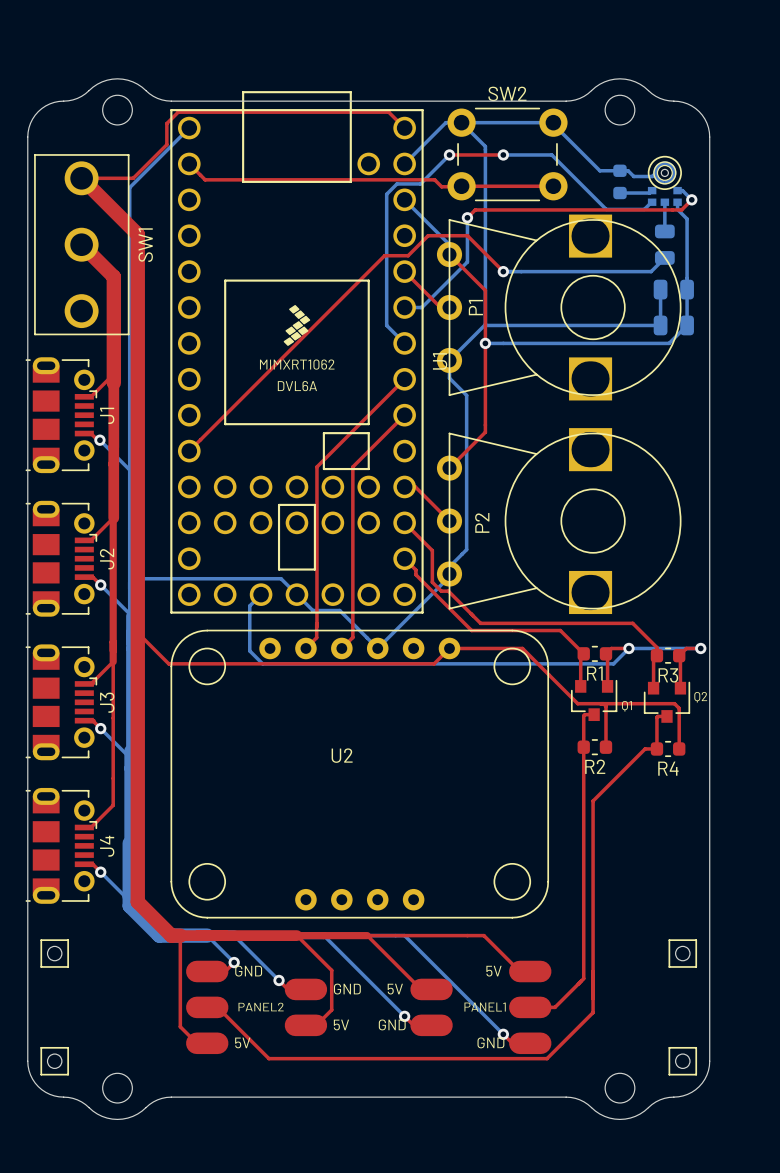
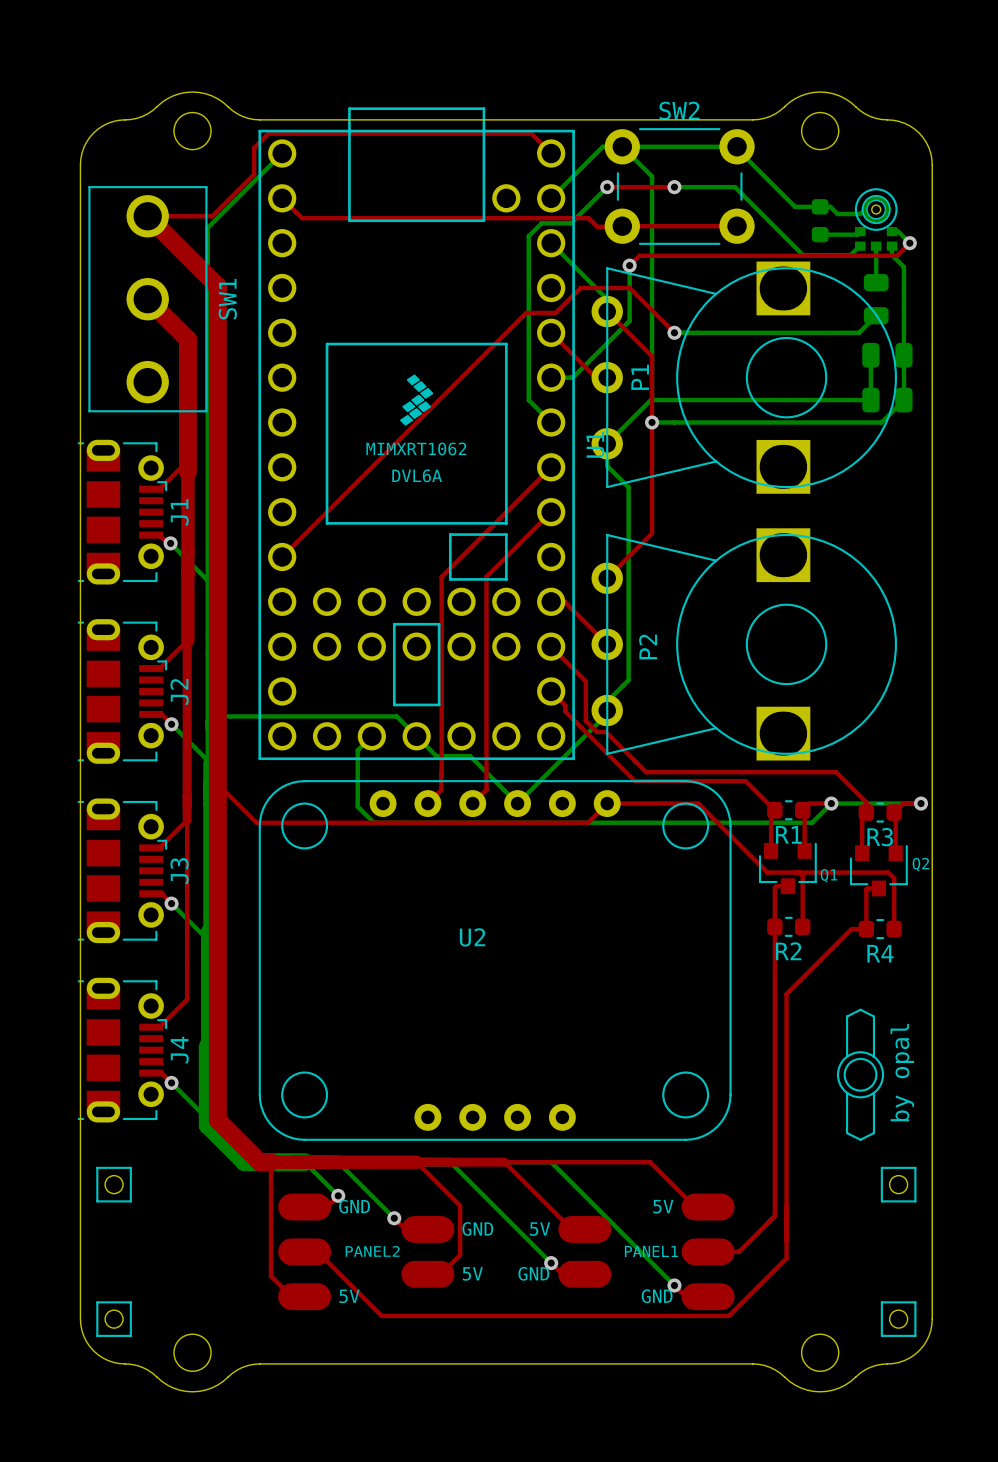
drawing: none -> [836, 1051, 885, 1099]
line: none -> (847, 1056) (847, 1016) (860, 1009) (873, 1016) (873, 1056)
text: none -> by opal (902, 1072)
line: none -> (847, 1092) (847, 1133) (860, 1139) (873, 1133) (873, 1092)

